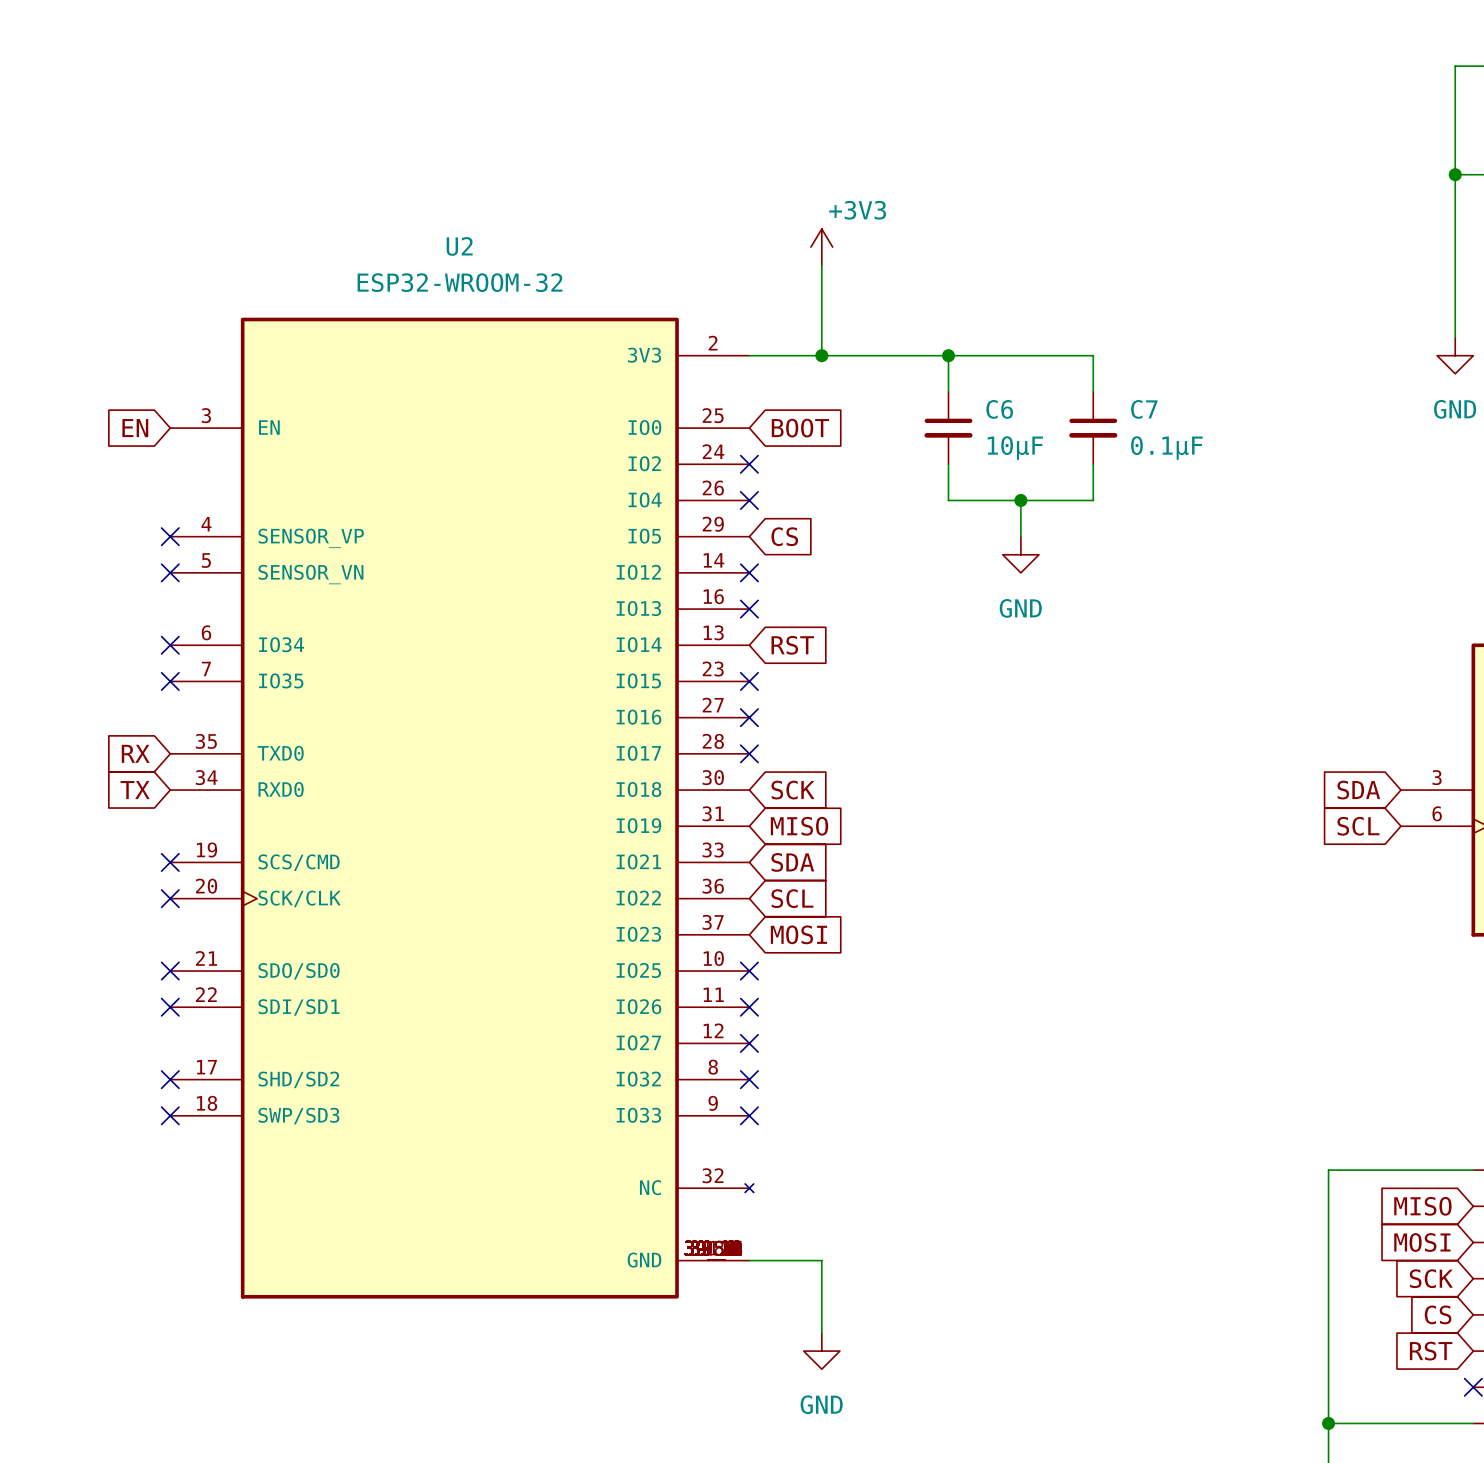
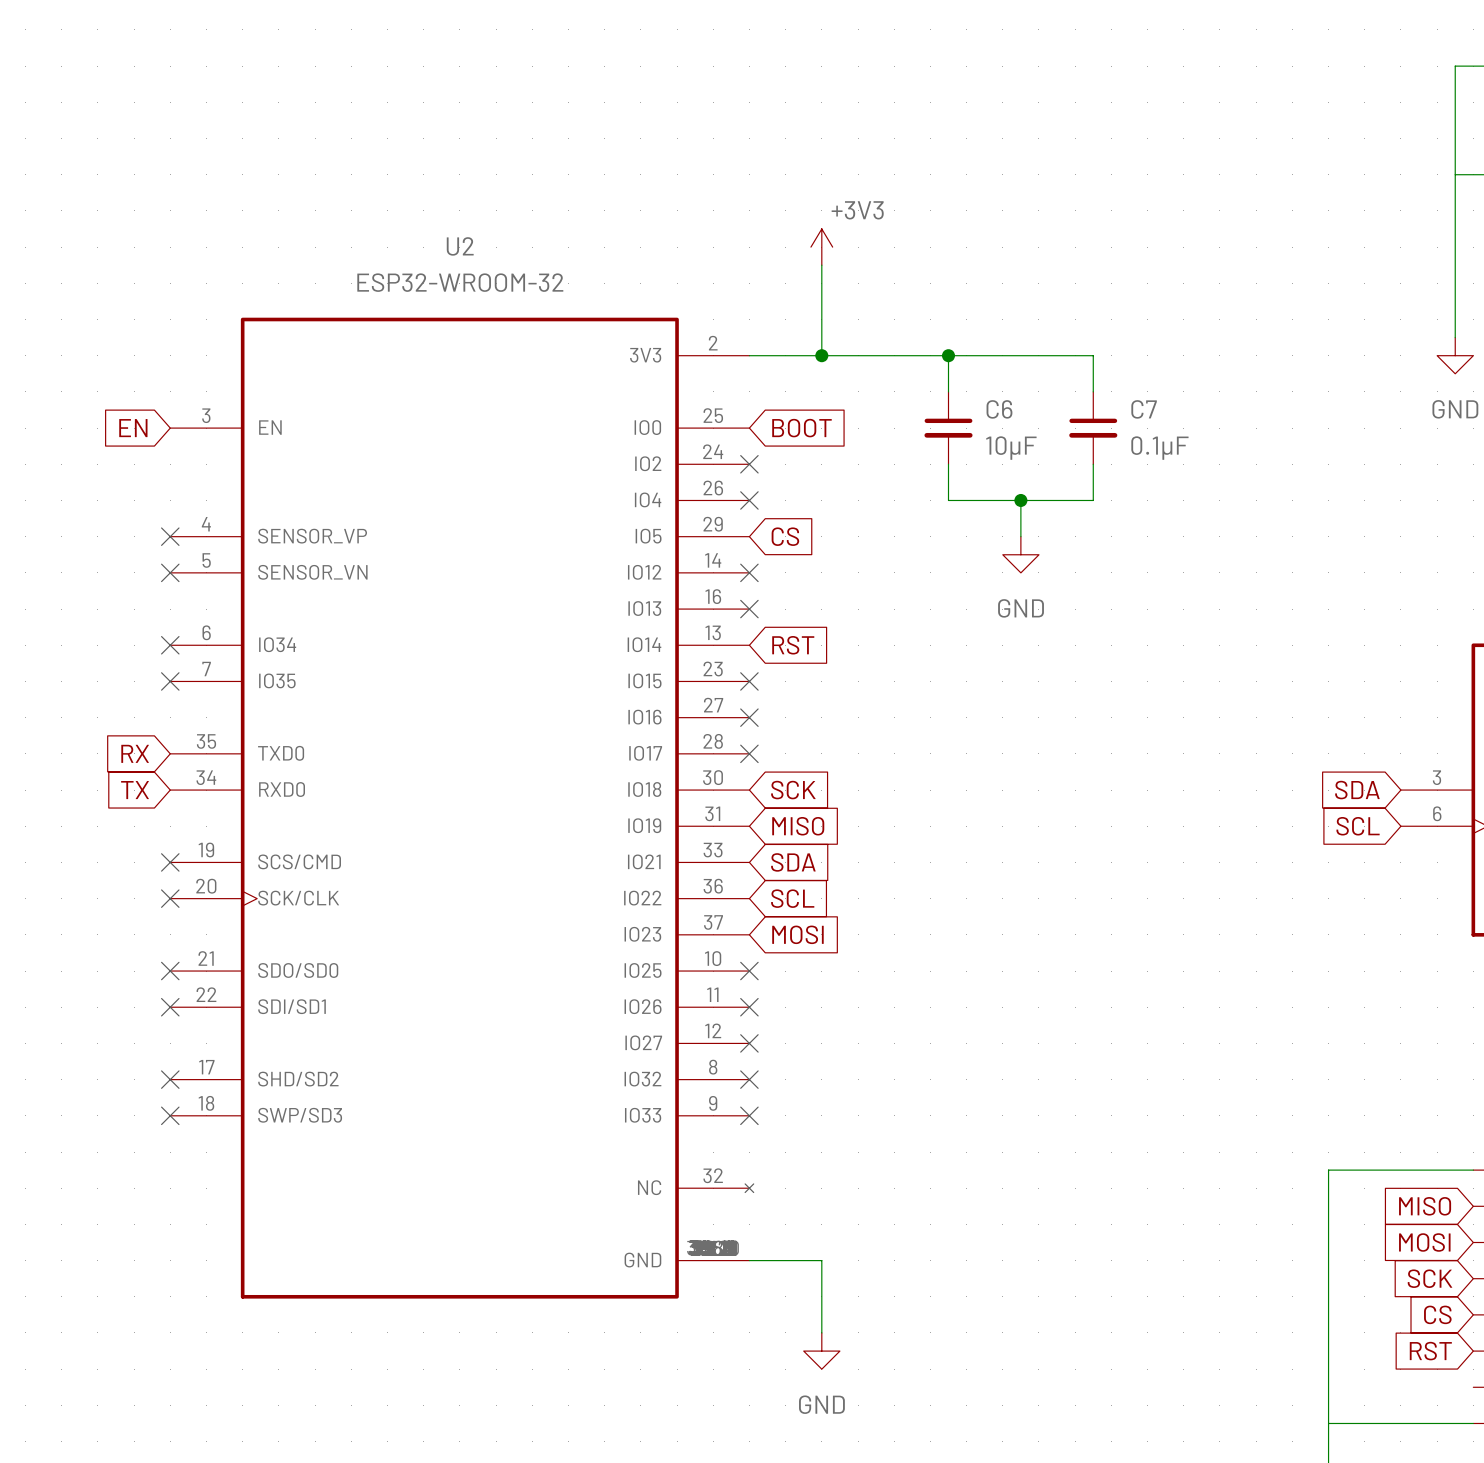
junction: (1455, 174) -> none
no-connect mark: (1473, 1387) -> none
junction: (1328, 1423) -> none

